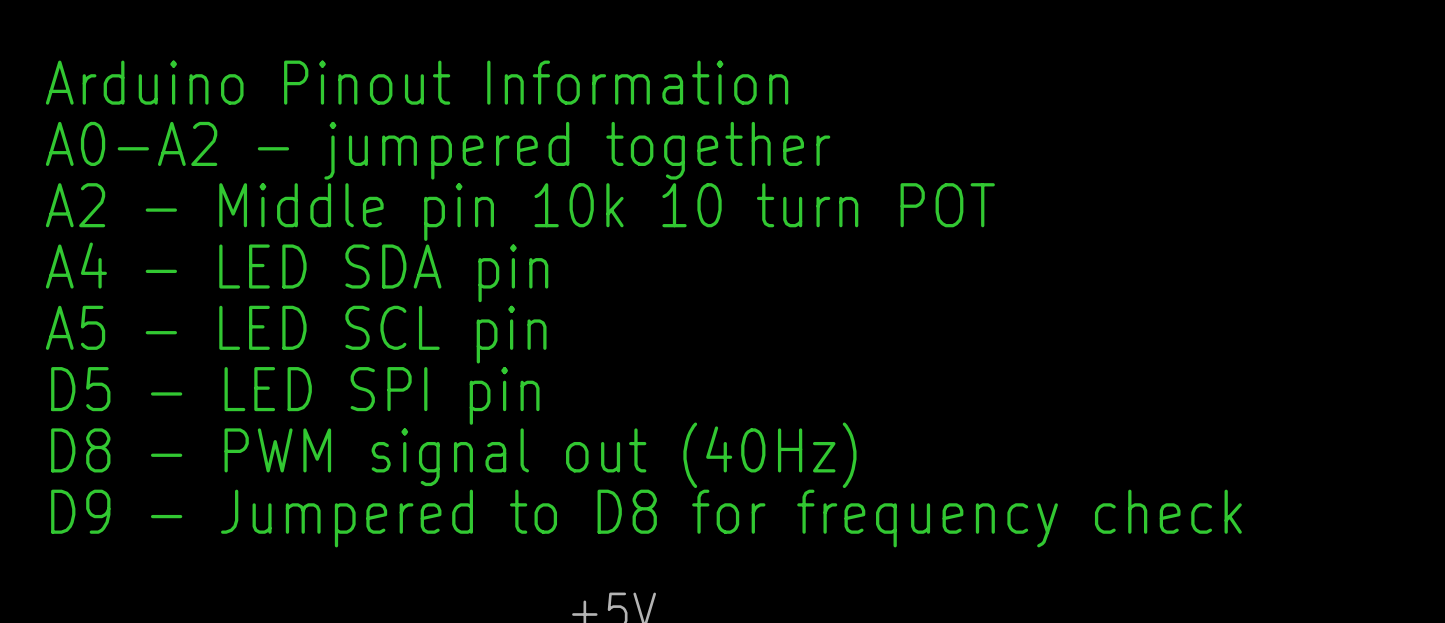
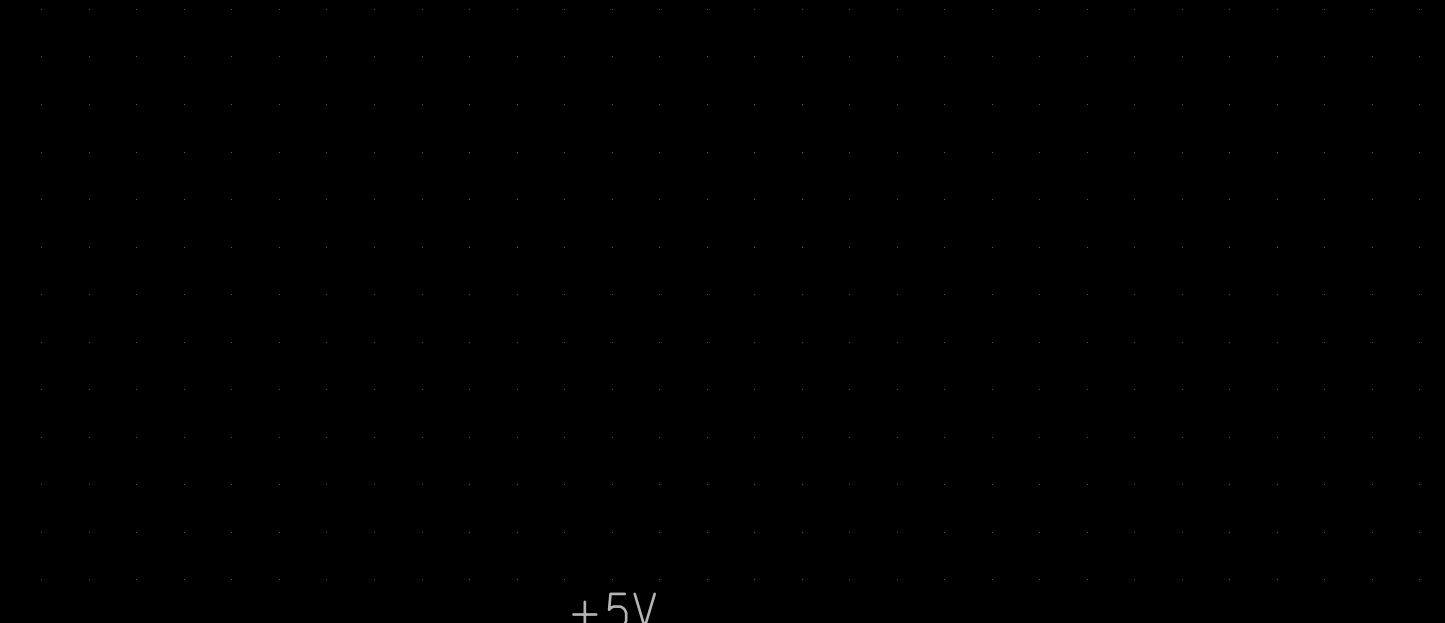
text: Arduino Pinout Information (417, 82) -> none
text: A0-A2 - jumpered together (438, 150) -> none
text: A2 - Middle pin 10k 10 turn POT (520, 212) -> none
text: A4 - LED SDA pin (297, 272) -> none
text: A5 - LED SCL pin (296, 334) -> none
text: D5 - LED SPI pin (295, 395) -> none
text: D8 - PWM signal out (40Hz) (453, 455) -> none
text: D9 - Jumpered to D8 for frequency check (646, 518) -> none

